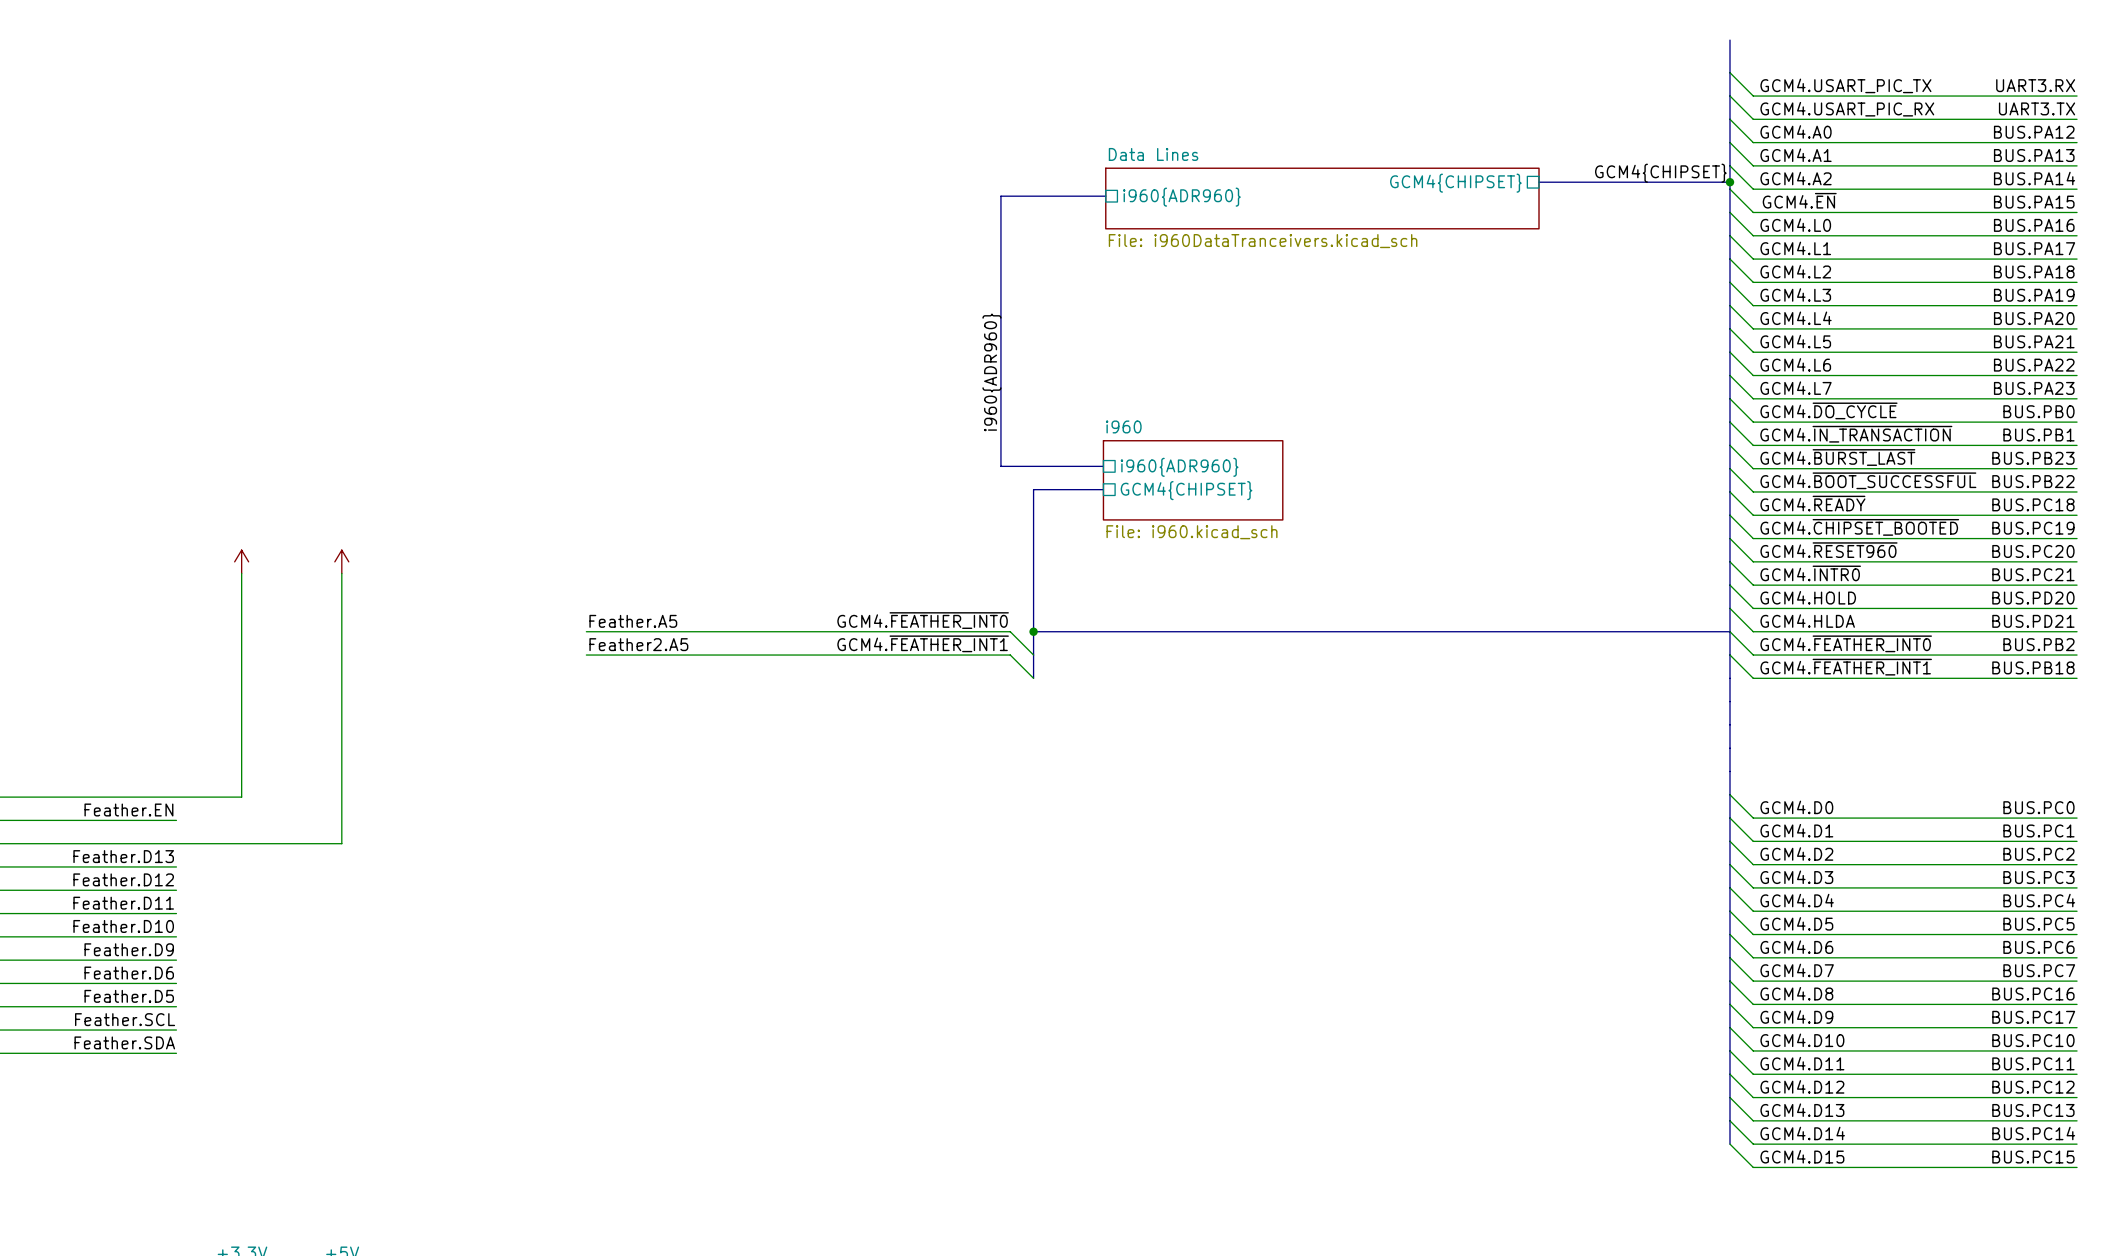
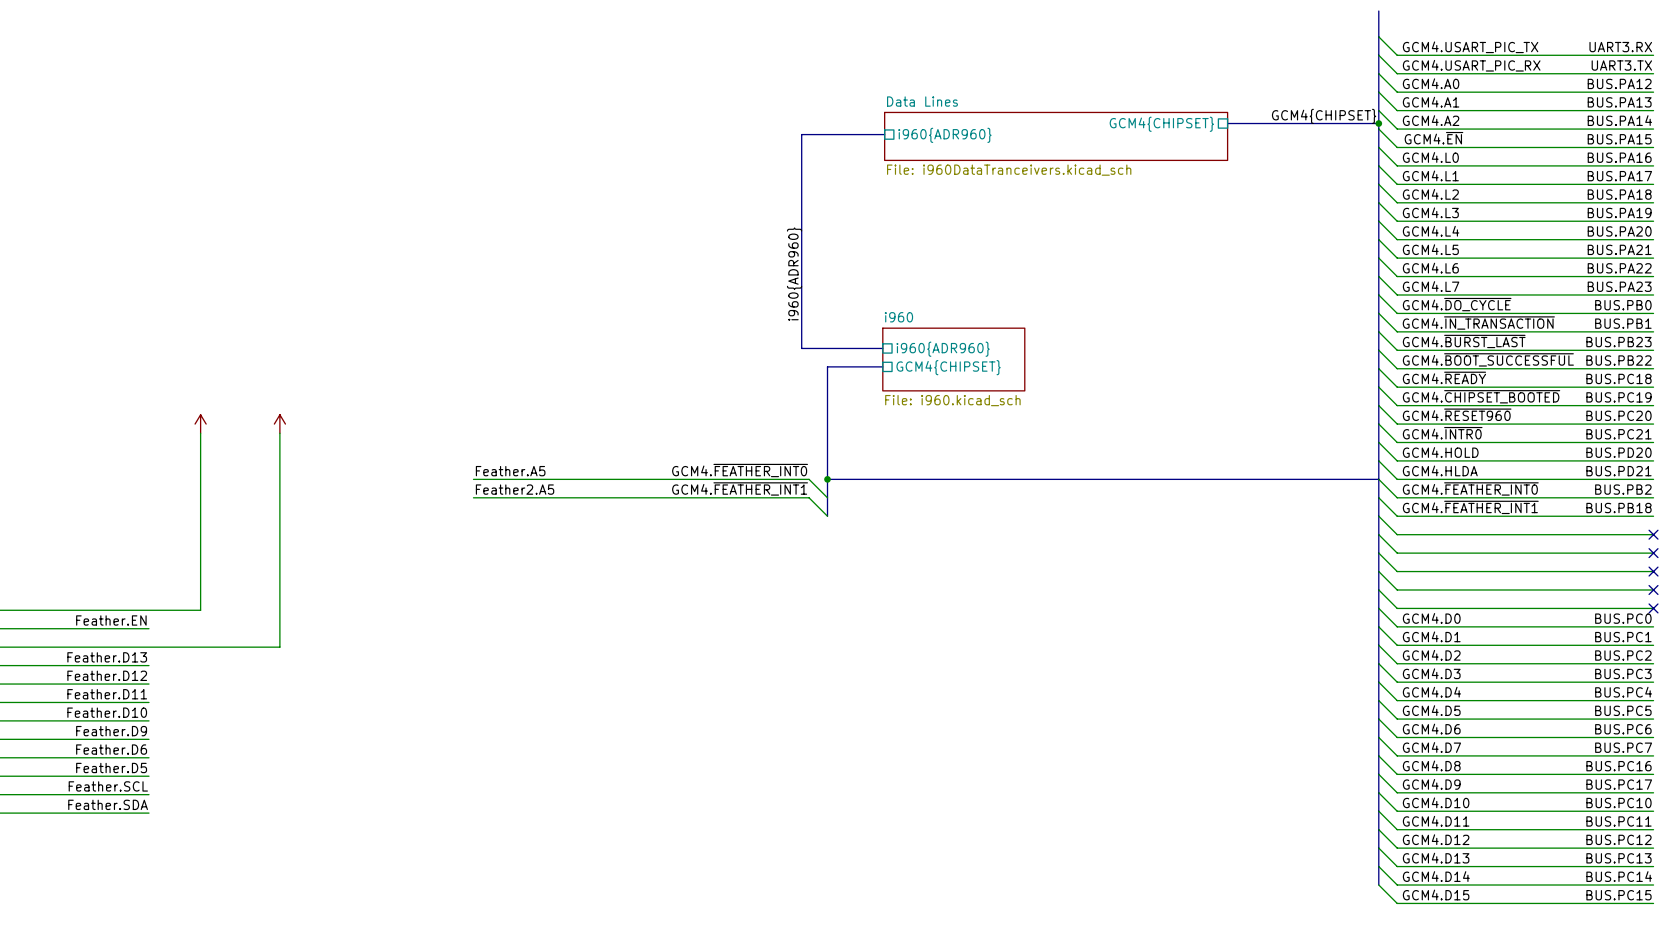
wire: none -> (1378, 516) (1397, 534) (1653, 534)
wire: none -> (1378, 534) (1397, 553) (1653, 553)
no-connect mark: none -> (1653, 534)
wire: none -> (1378, 553) (1397, 571) (1653, 571)
no-connect mark: none -> (1653, 553)
wire: none -> (1378, 571) (1397, 589) (1653, 589)
no-connect mark: none -> (1653, 571)
wire: none -> (1378, 589) (1397, 608) (1653, 608)
no-connect mark: none -> (1653, 589)
no-connect mark: none -> (1653, 608)

